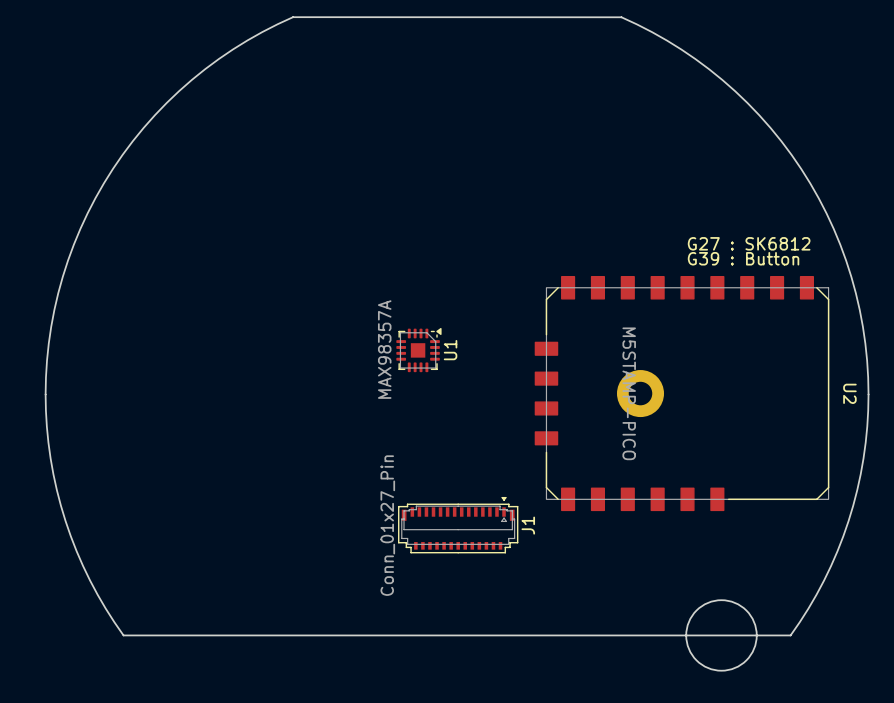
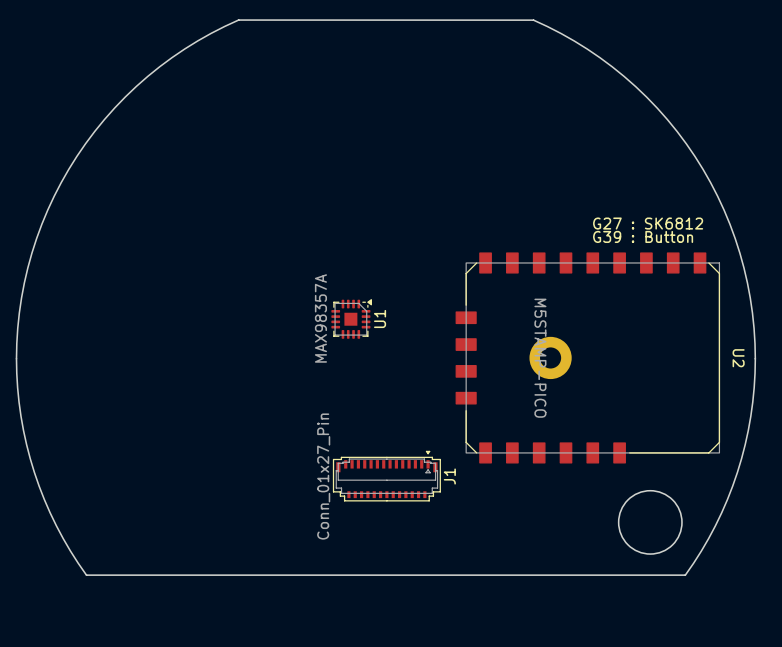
round board edge position: (721, 635) -> (650, 522)

